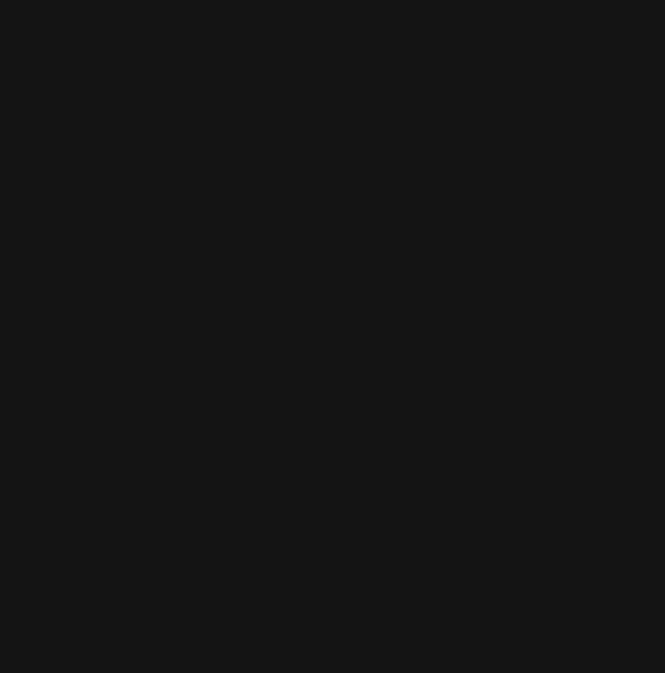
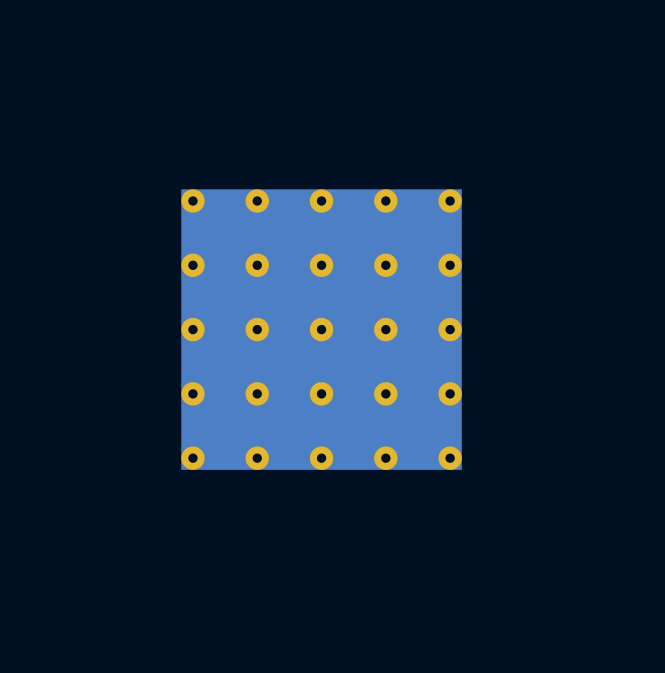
part: none -> (321, 329)

